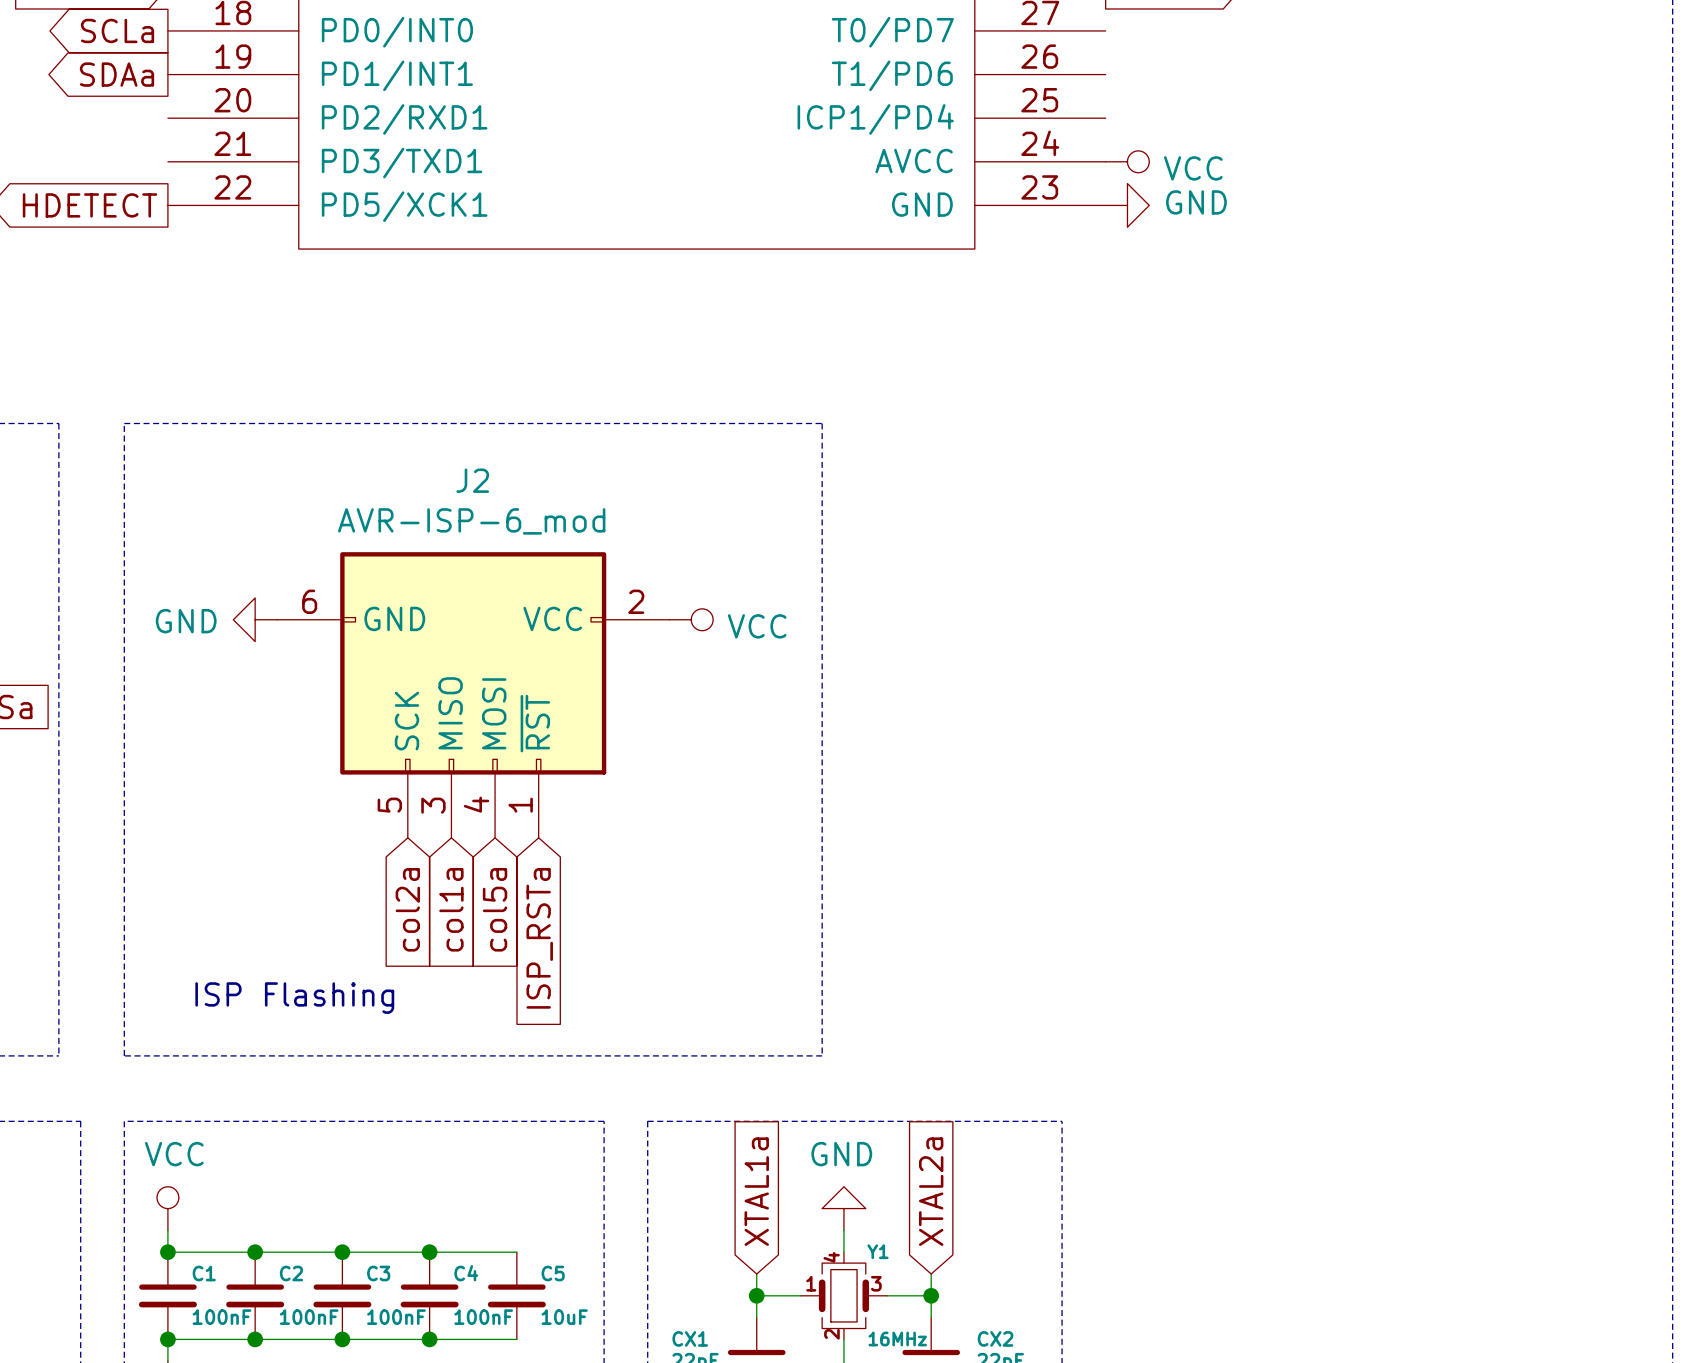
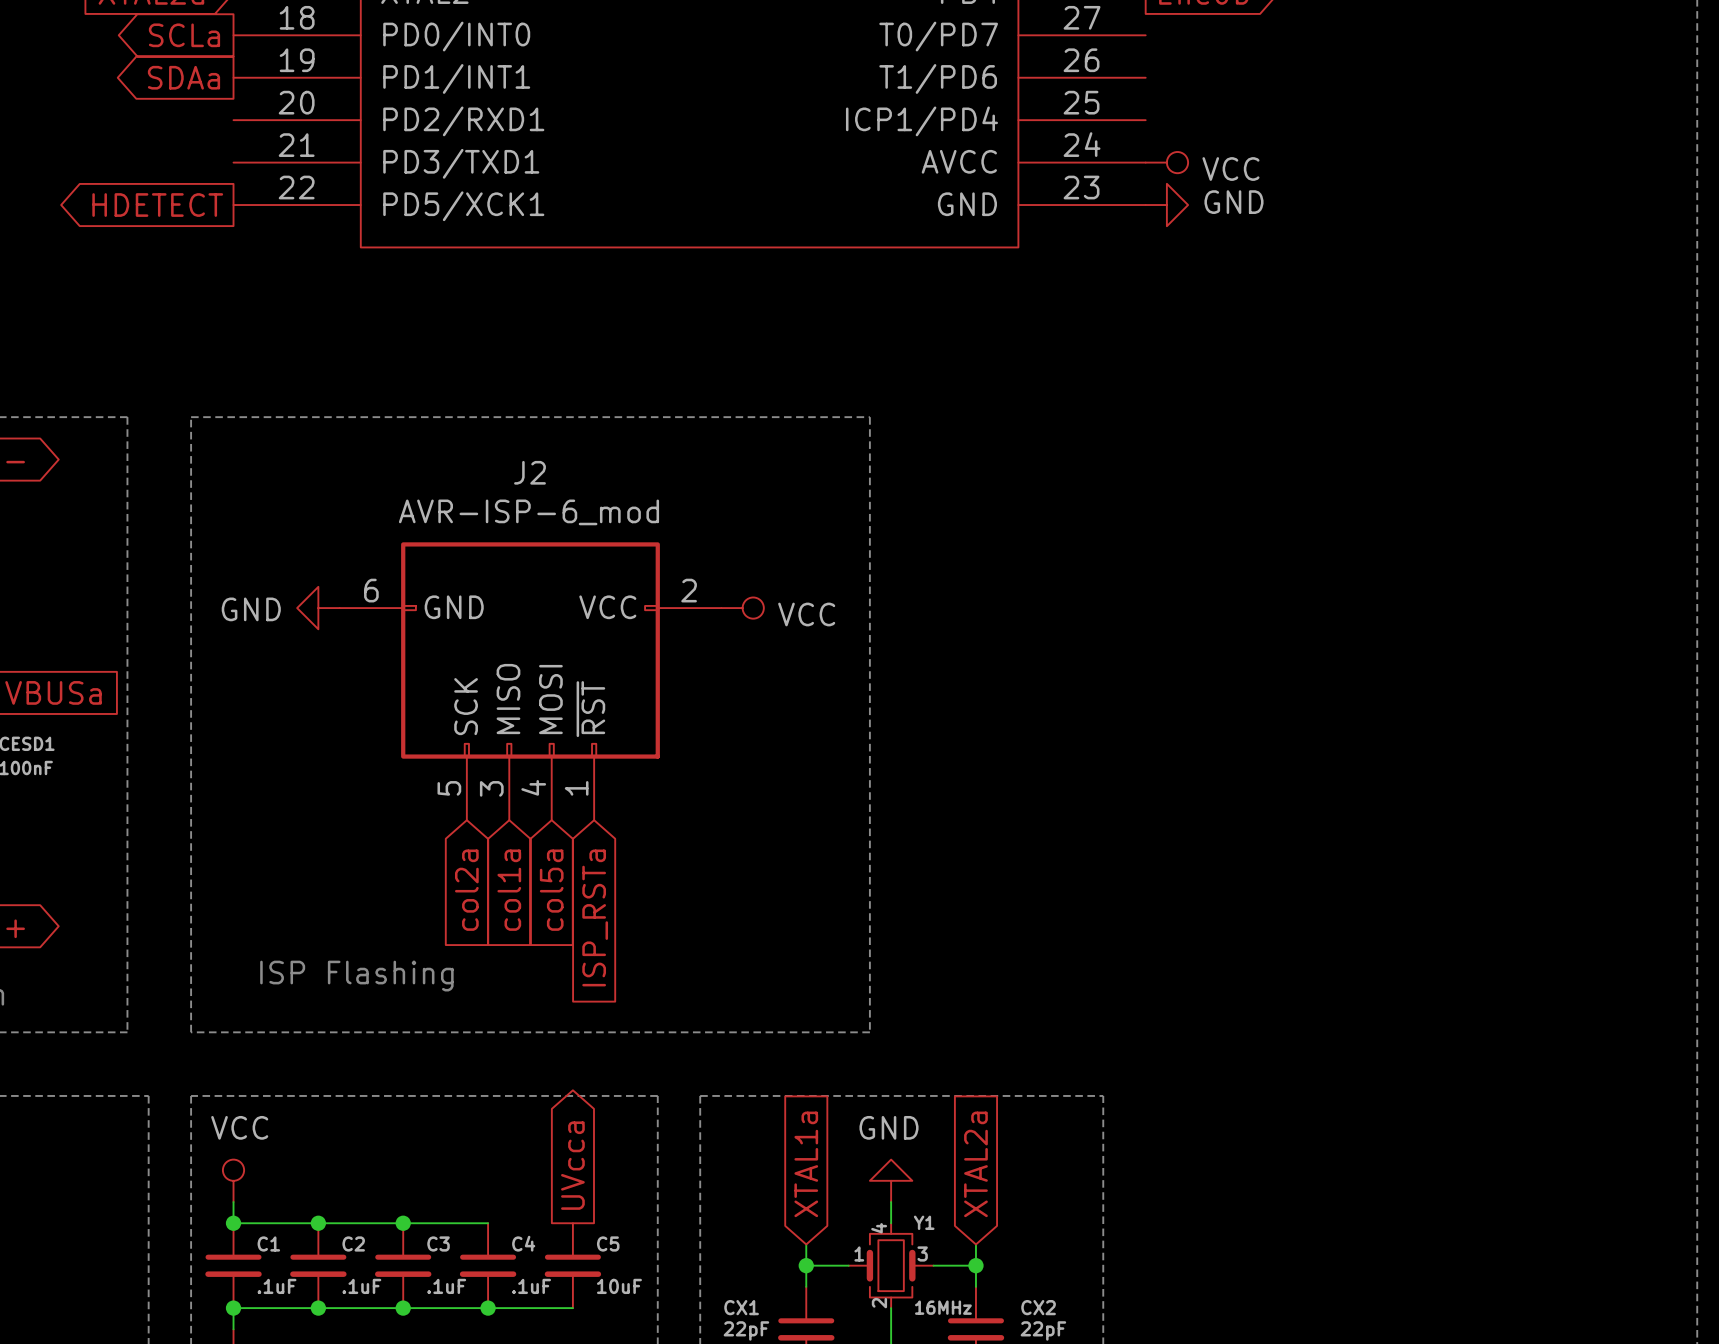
global label: none -> UVcca (572, 1165)
wire: (429, 1252) (516, 1252) -> none
junction: (429, 1252) -> none
C1 value: 100nF (221, 1317) -> .1uF (277, 1286)
C2 value: 100nF (309, 1317) -> .1uF (361, 1286)
C3 value: 100nF (396, 1317) -> .1uF (446, 1286)
C4 value: 100nF (483, 1317) -> .1uF (531, 1286)

